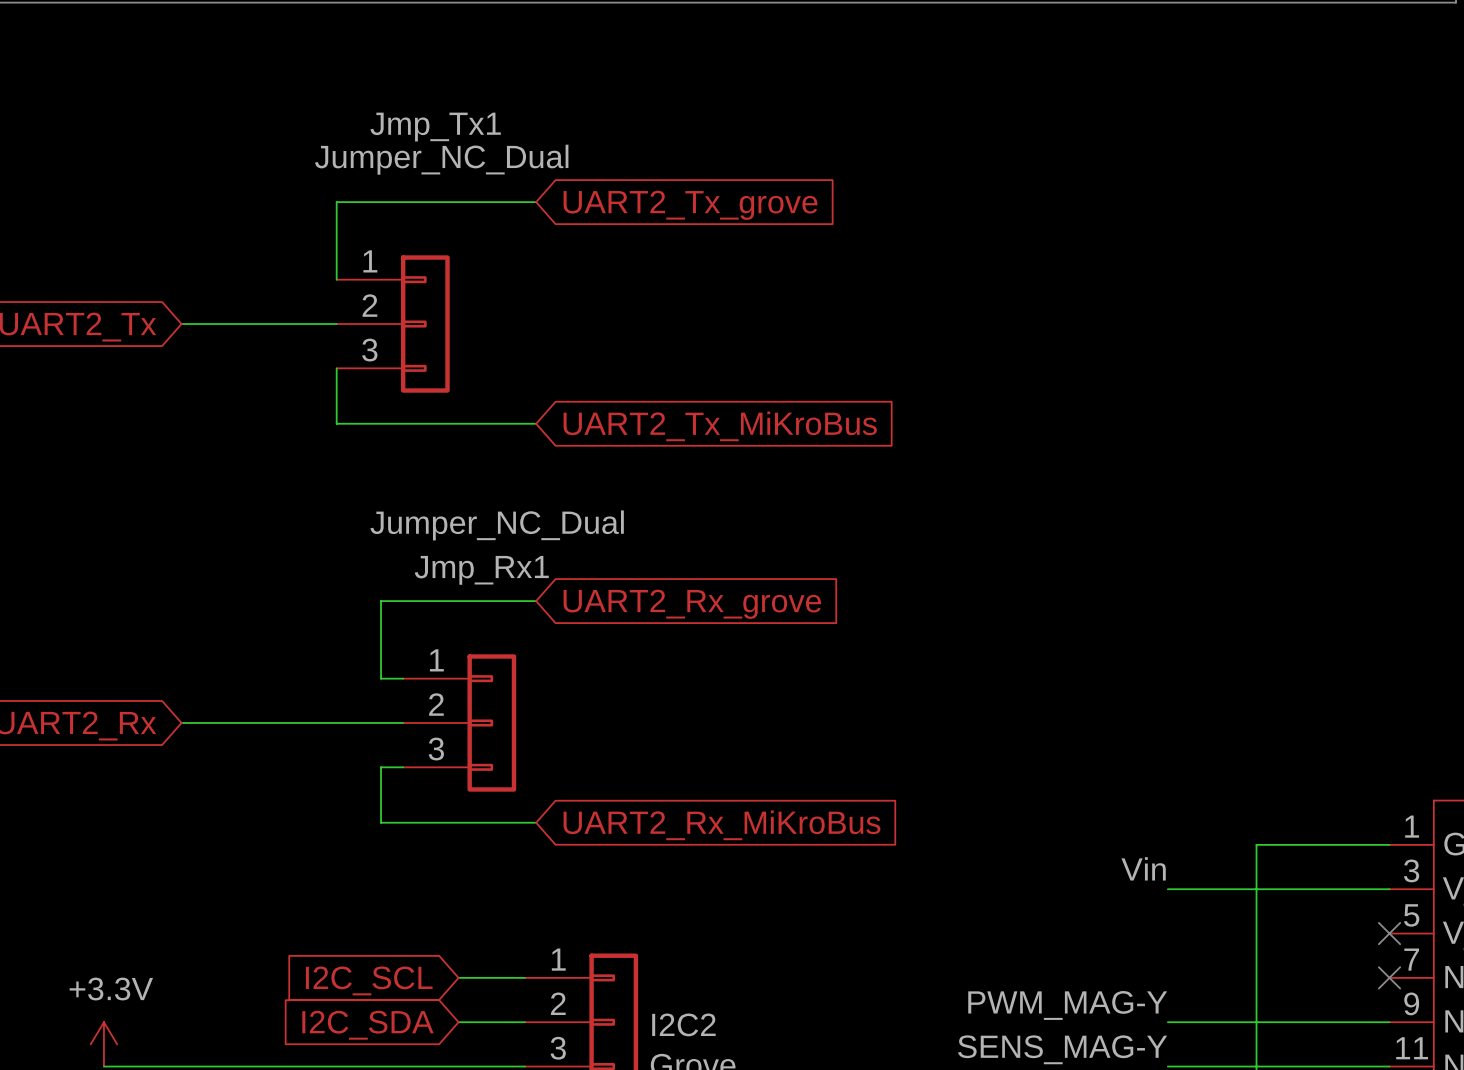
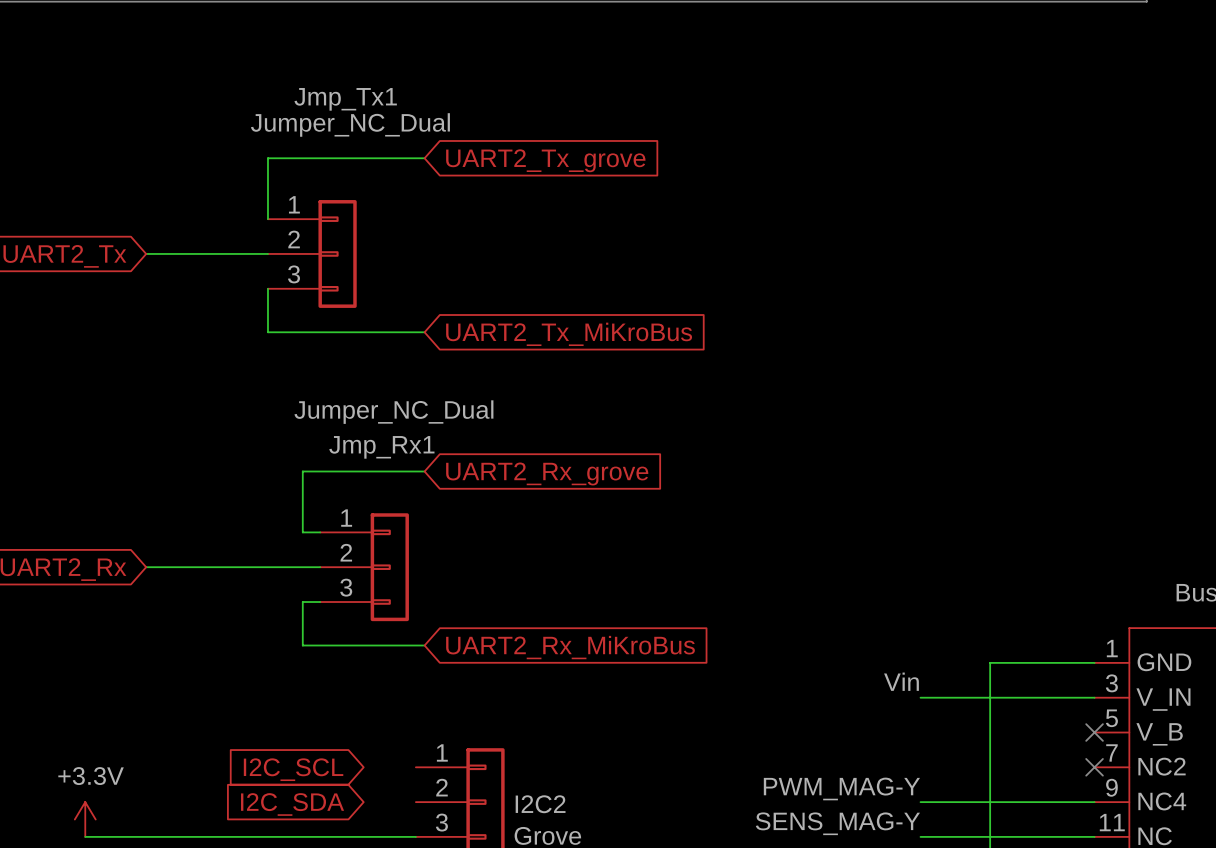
wire: (458, 977) (525, 977) -> none
wire: (458, 1022) (525, 1022) -> none

